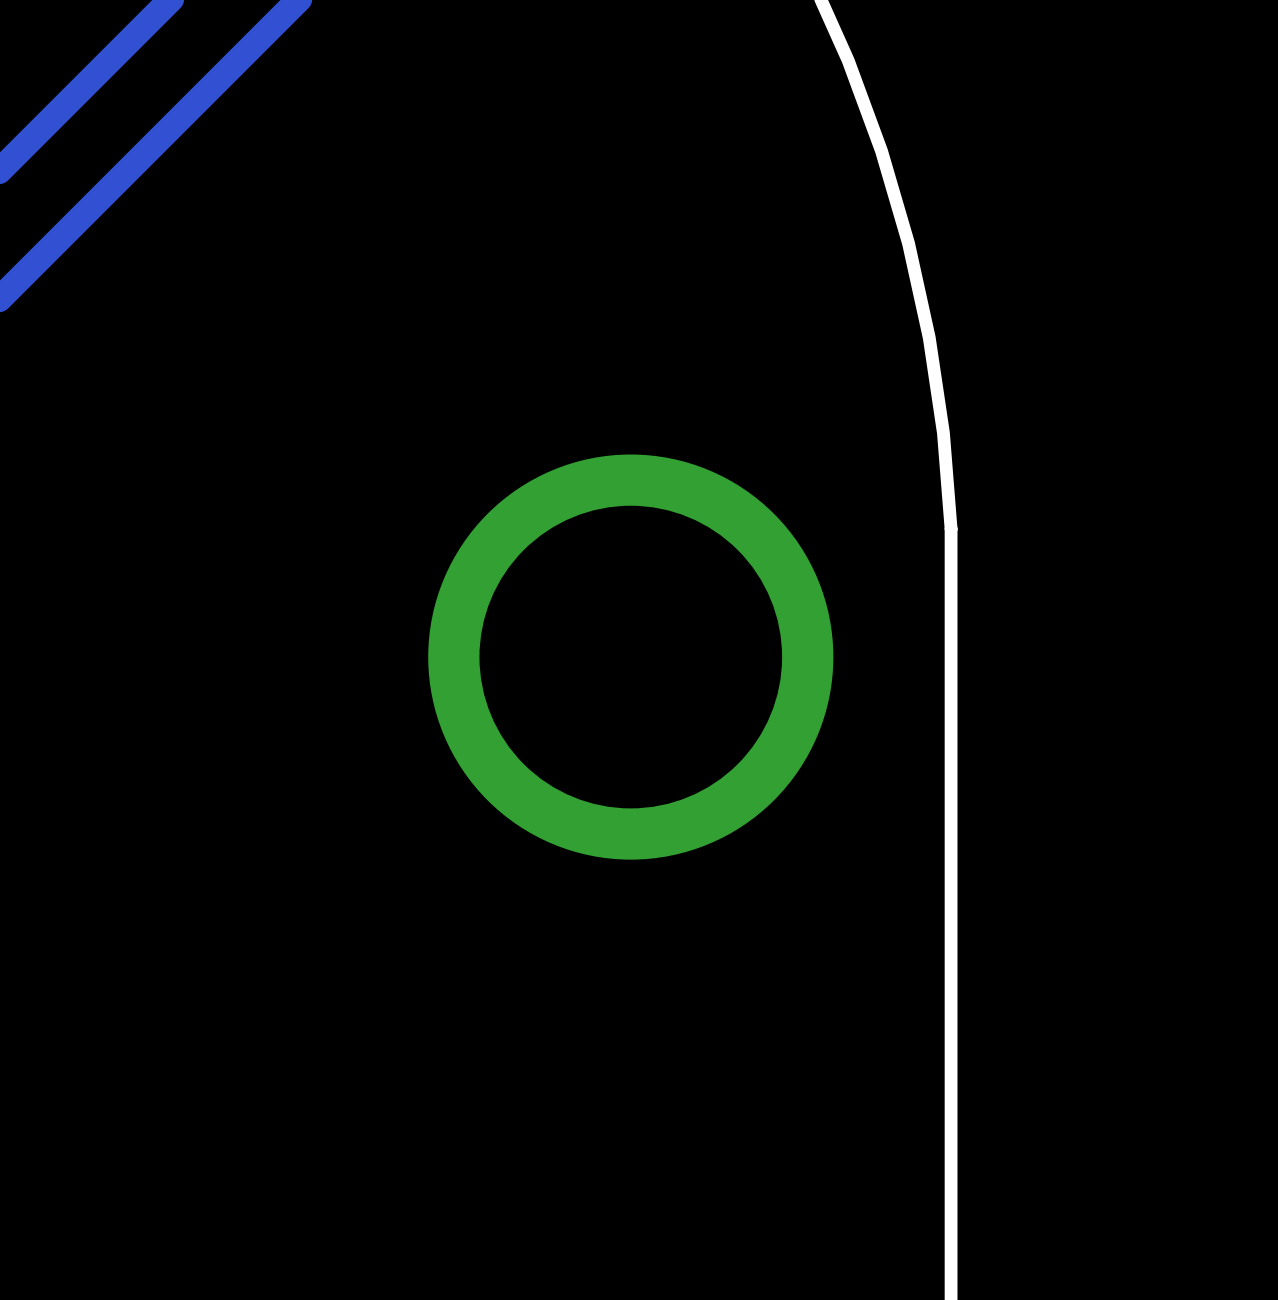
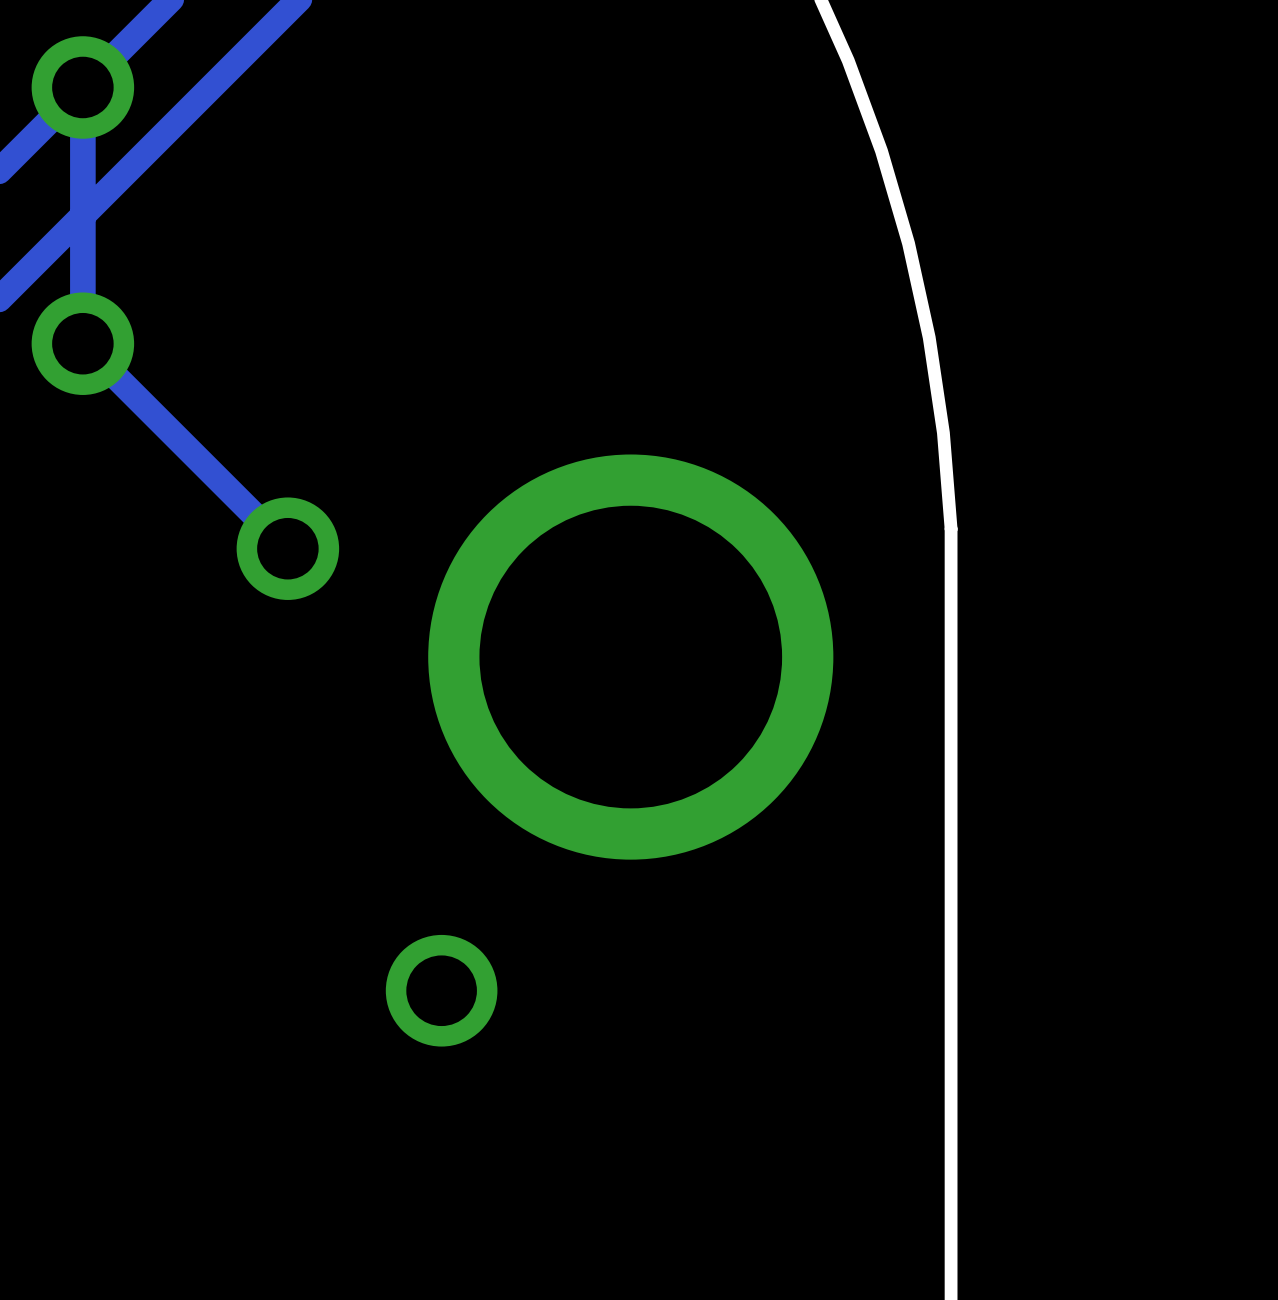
track: none -> (82, 87) (82, 343) (287, 548)
via: none -> (82, 87)
via: none -> (82, 343)
via: none -> (287, 548)
via: none -> (441, 990)

